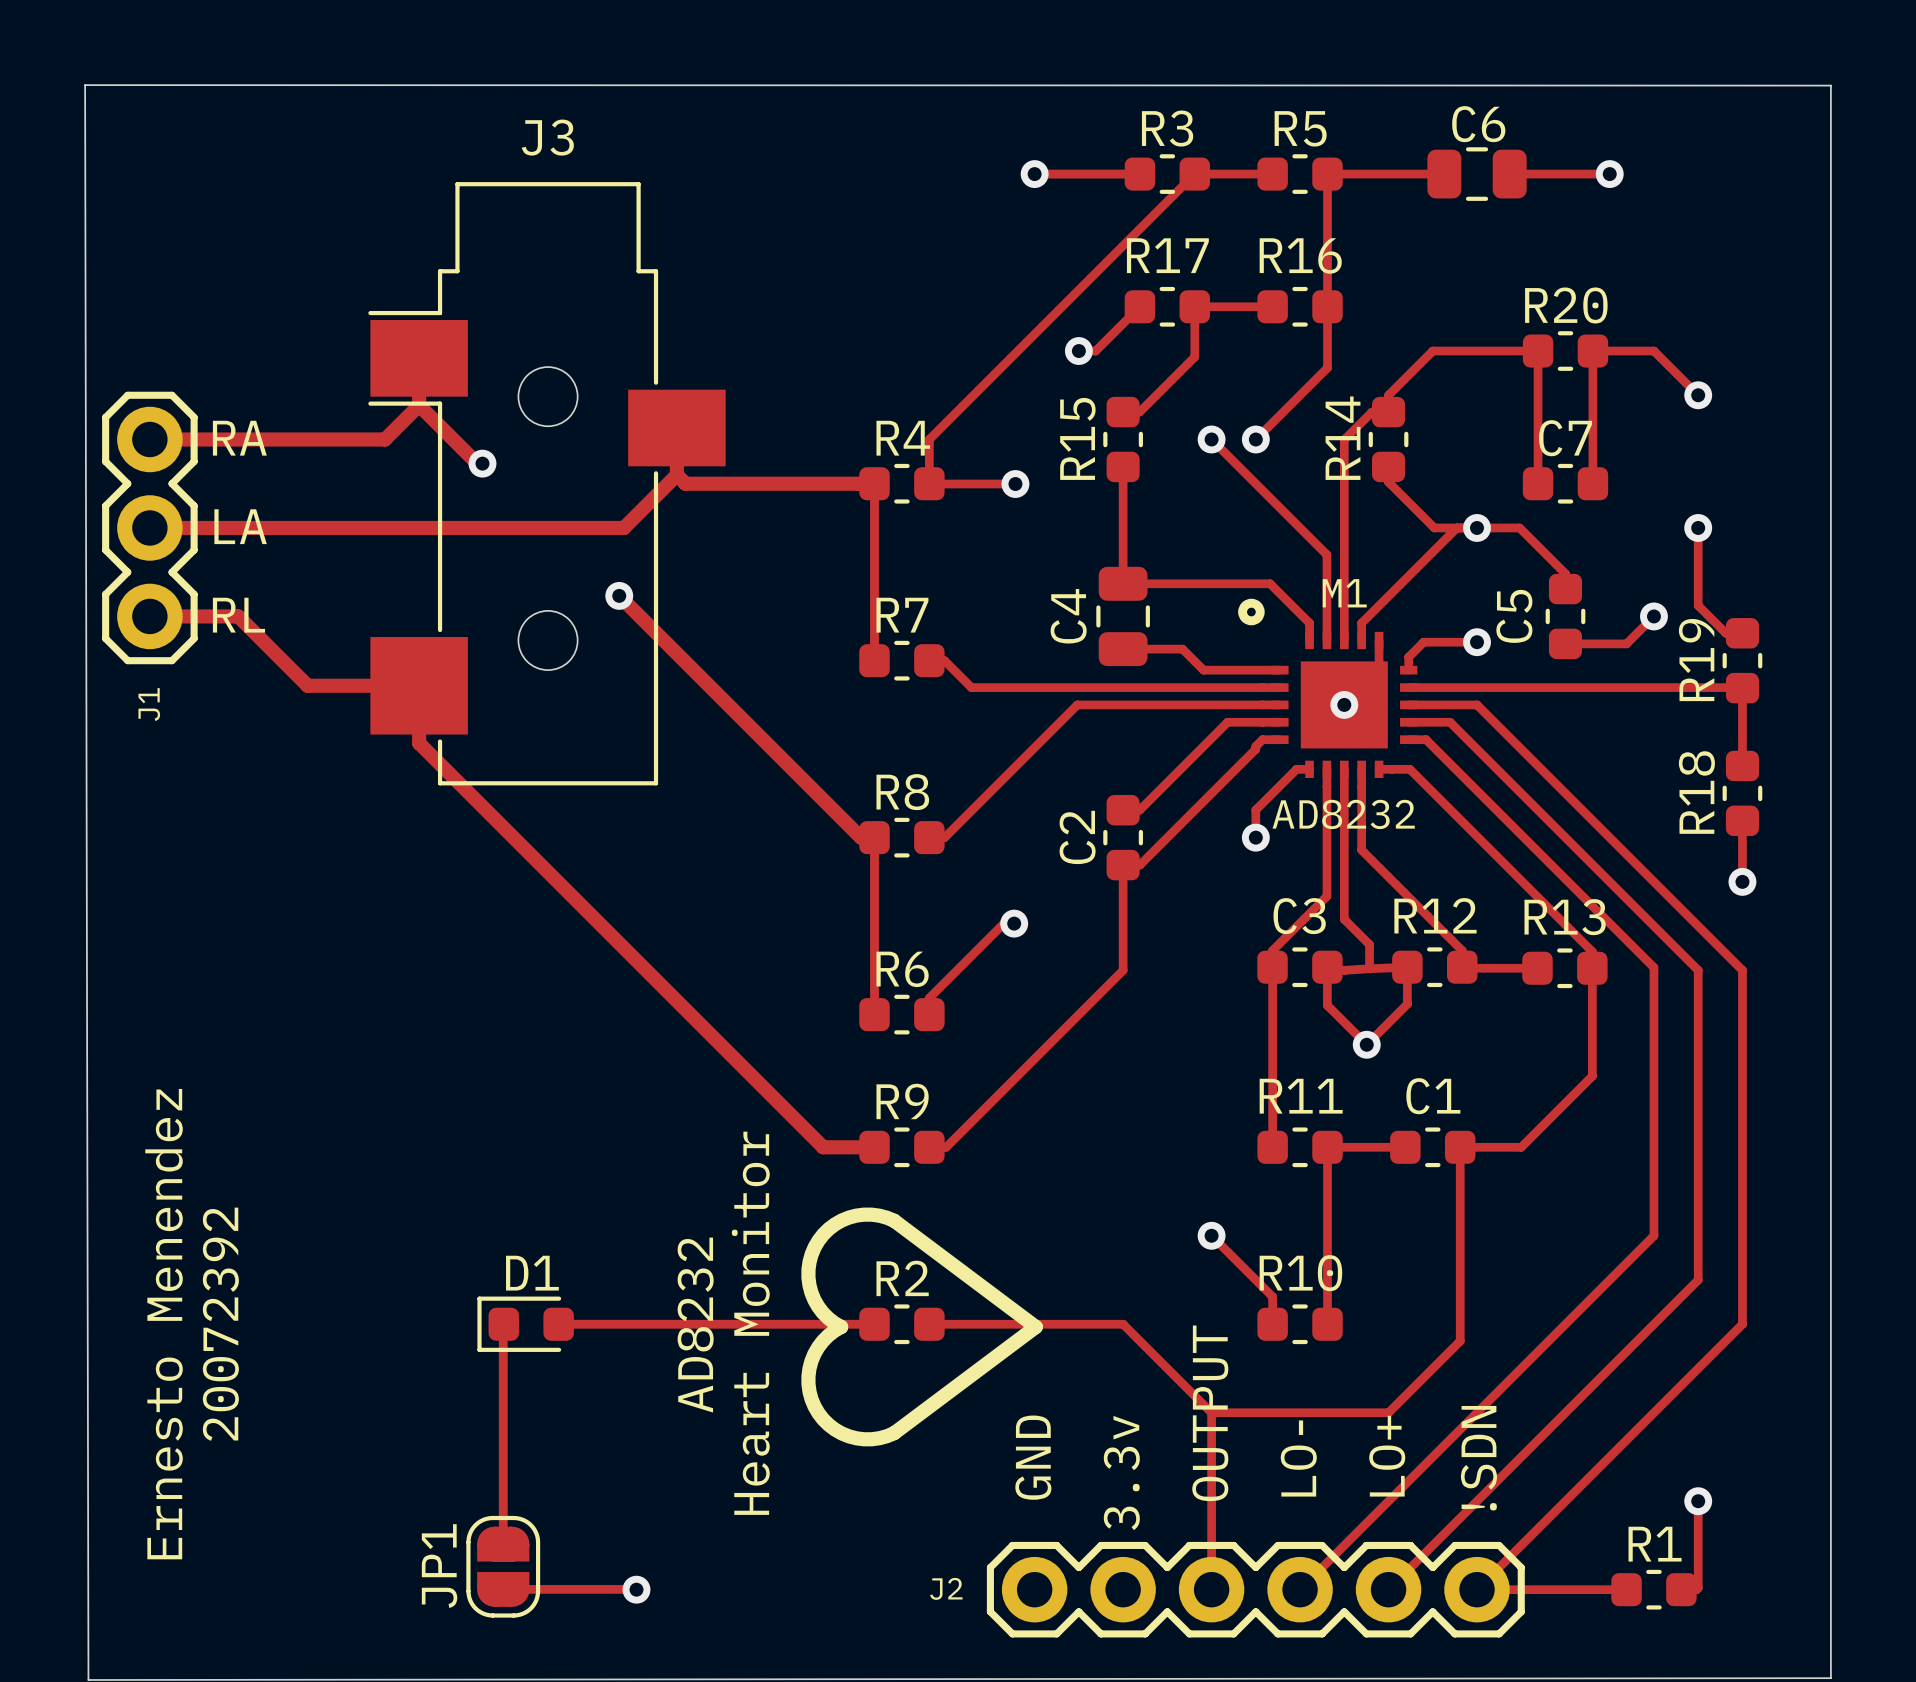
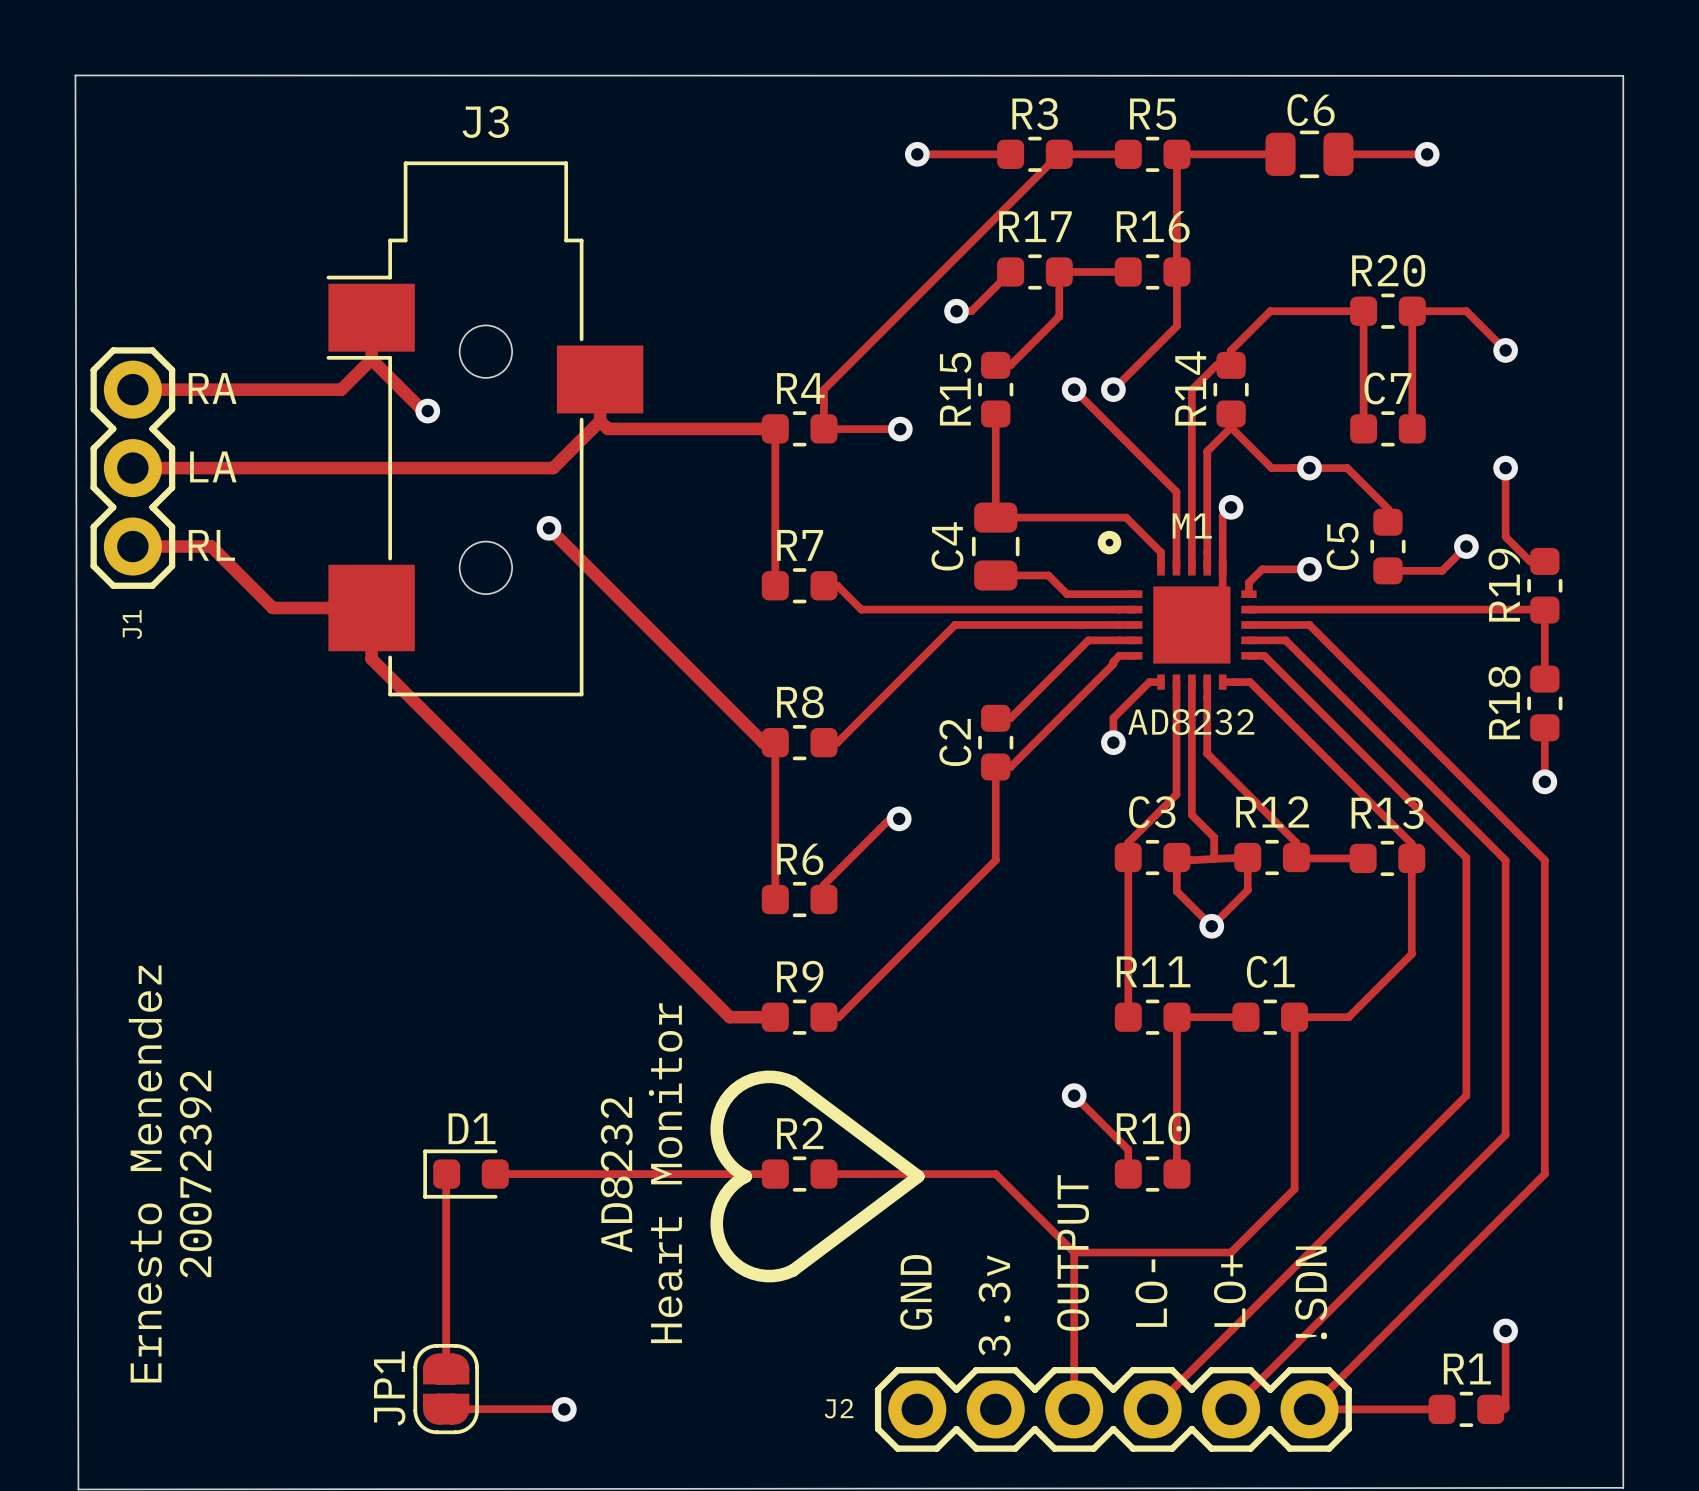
track: (1456, 527) (1361, 623) -> (1231, 427) (1207, 451) (1207, 552)
track: none -> (1231, 507) (1222, 515) (1222, 567)
via position: (1344, 704) -> (1231, 507)

